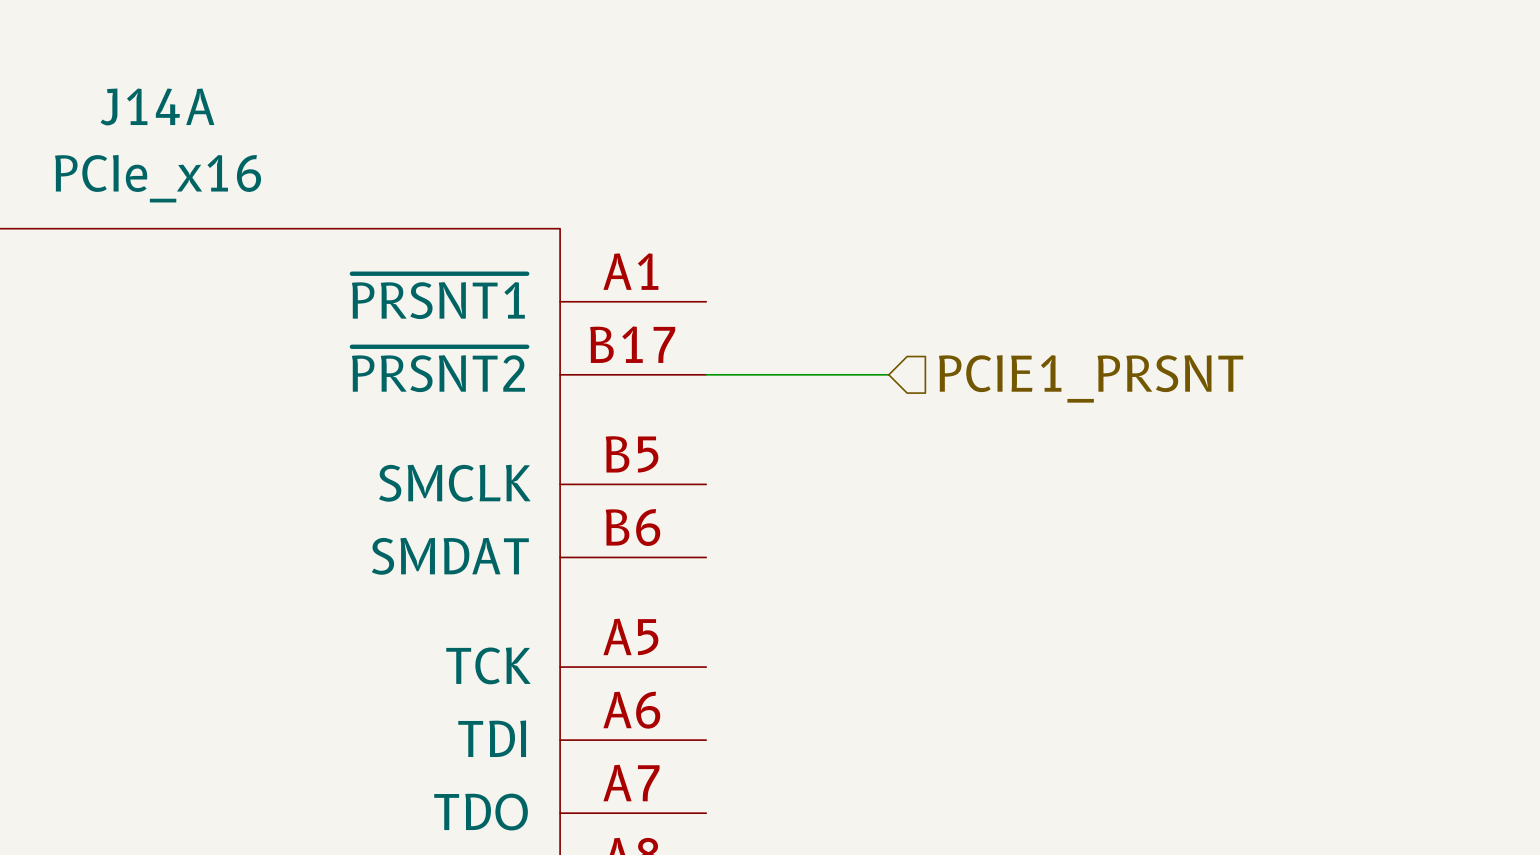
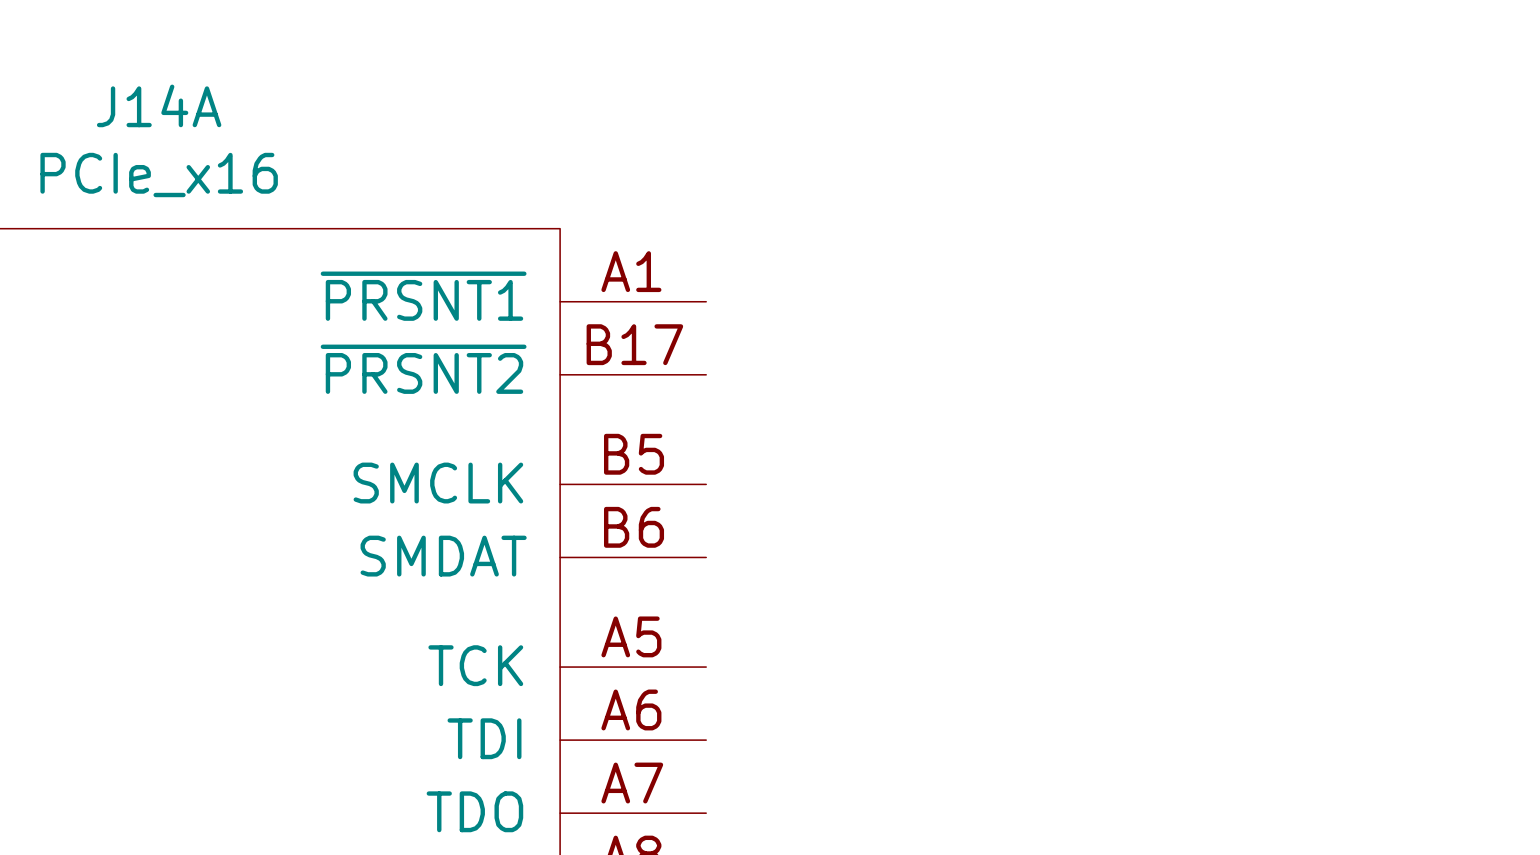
wire: (706, 374) (888, 374) -> none
hierarchical label: PCIE1_PRSNT (1091, 378) -> none

